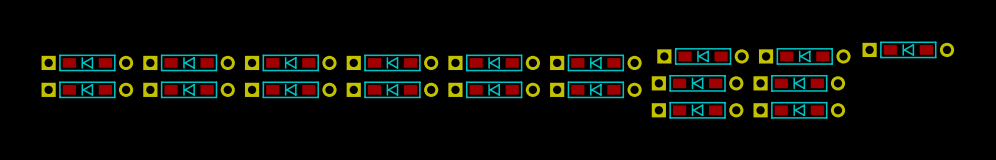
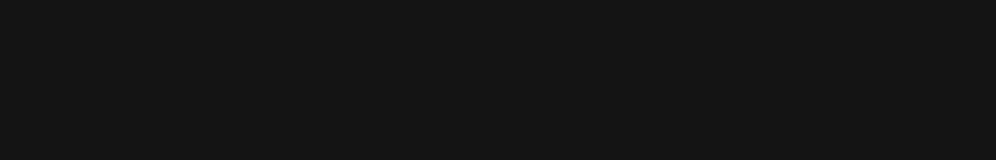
part: (908, 49) -> none
part: (703, 56) -> none
part: (804, 56) -> none
part: (87, 62) -> none
part: (189, 62) -> none
part: (290, 62) -> none
part: (392, 62) -> none
part: (494, 62) -> none
part: (595, 62) -> none
part: (697, 83) -> none
part: (799, 83) -> none
part: (87, 89) -> none
part: (189, 89) -> none
part: (290, 89) -> none
part: (392, 89) -> none
part: (494, 89) -> none
part: (595, 89) -> none
part: (697, 110) -> none
part: (799, 110) -> none

